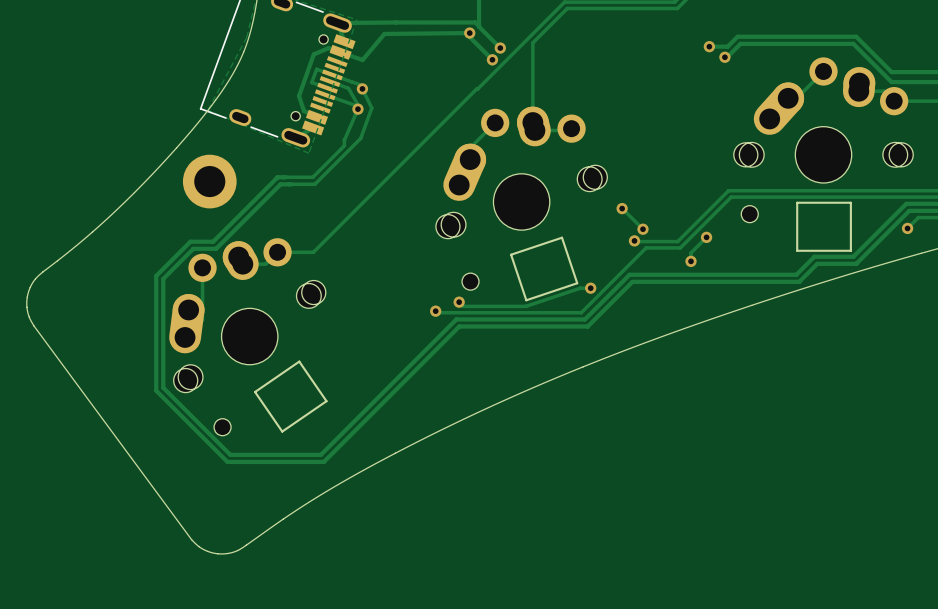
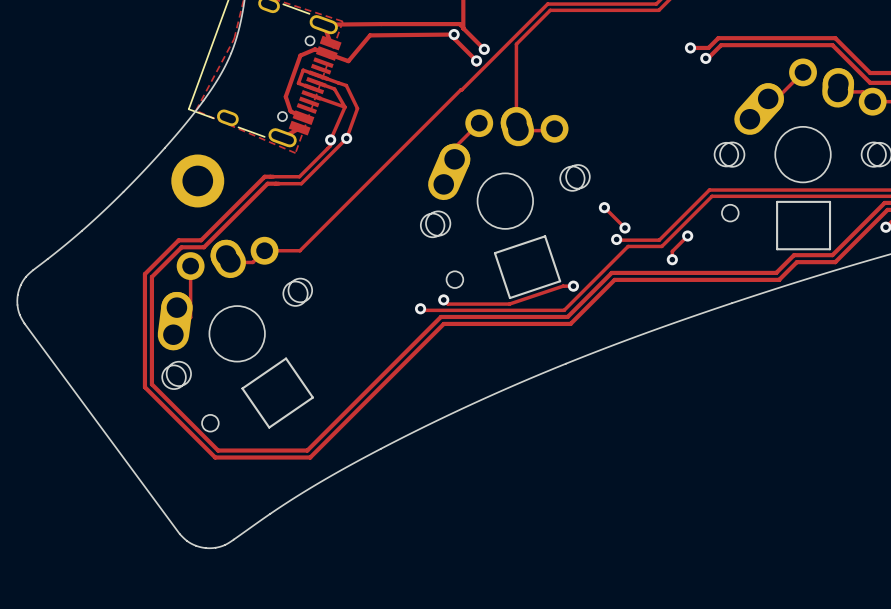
via: (362, 88) -> none
via: (357, 109) -> none
via: none -> (346, 138)
via: none -> (330, 139)

